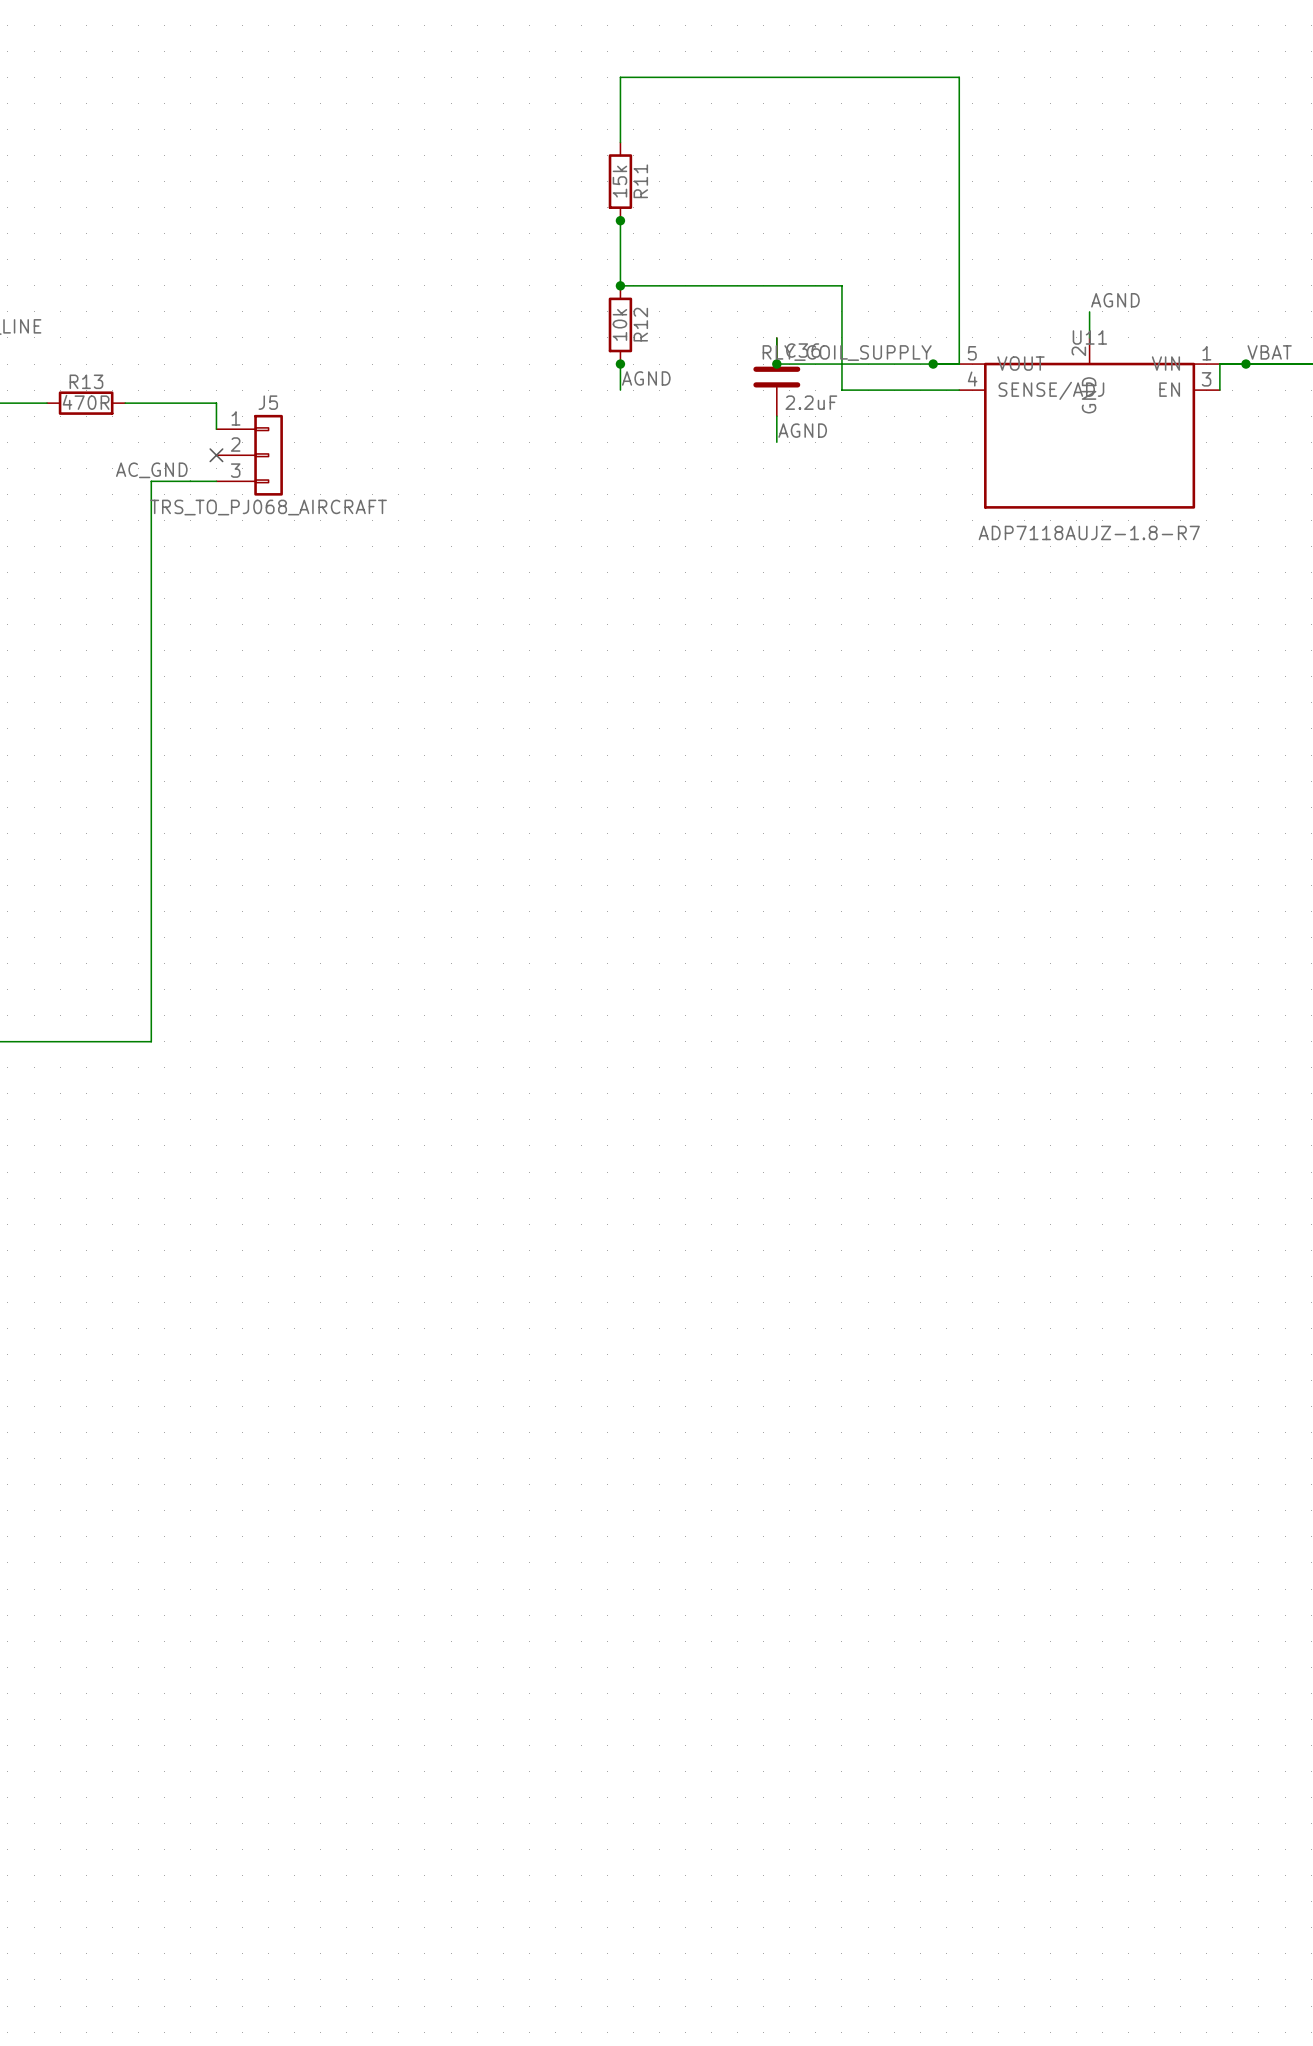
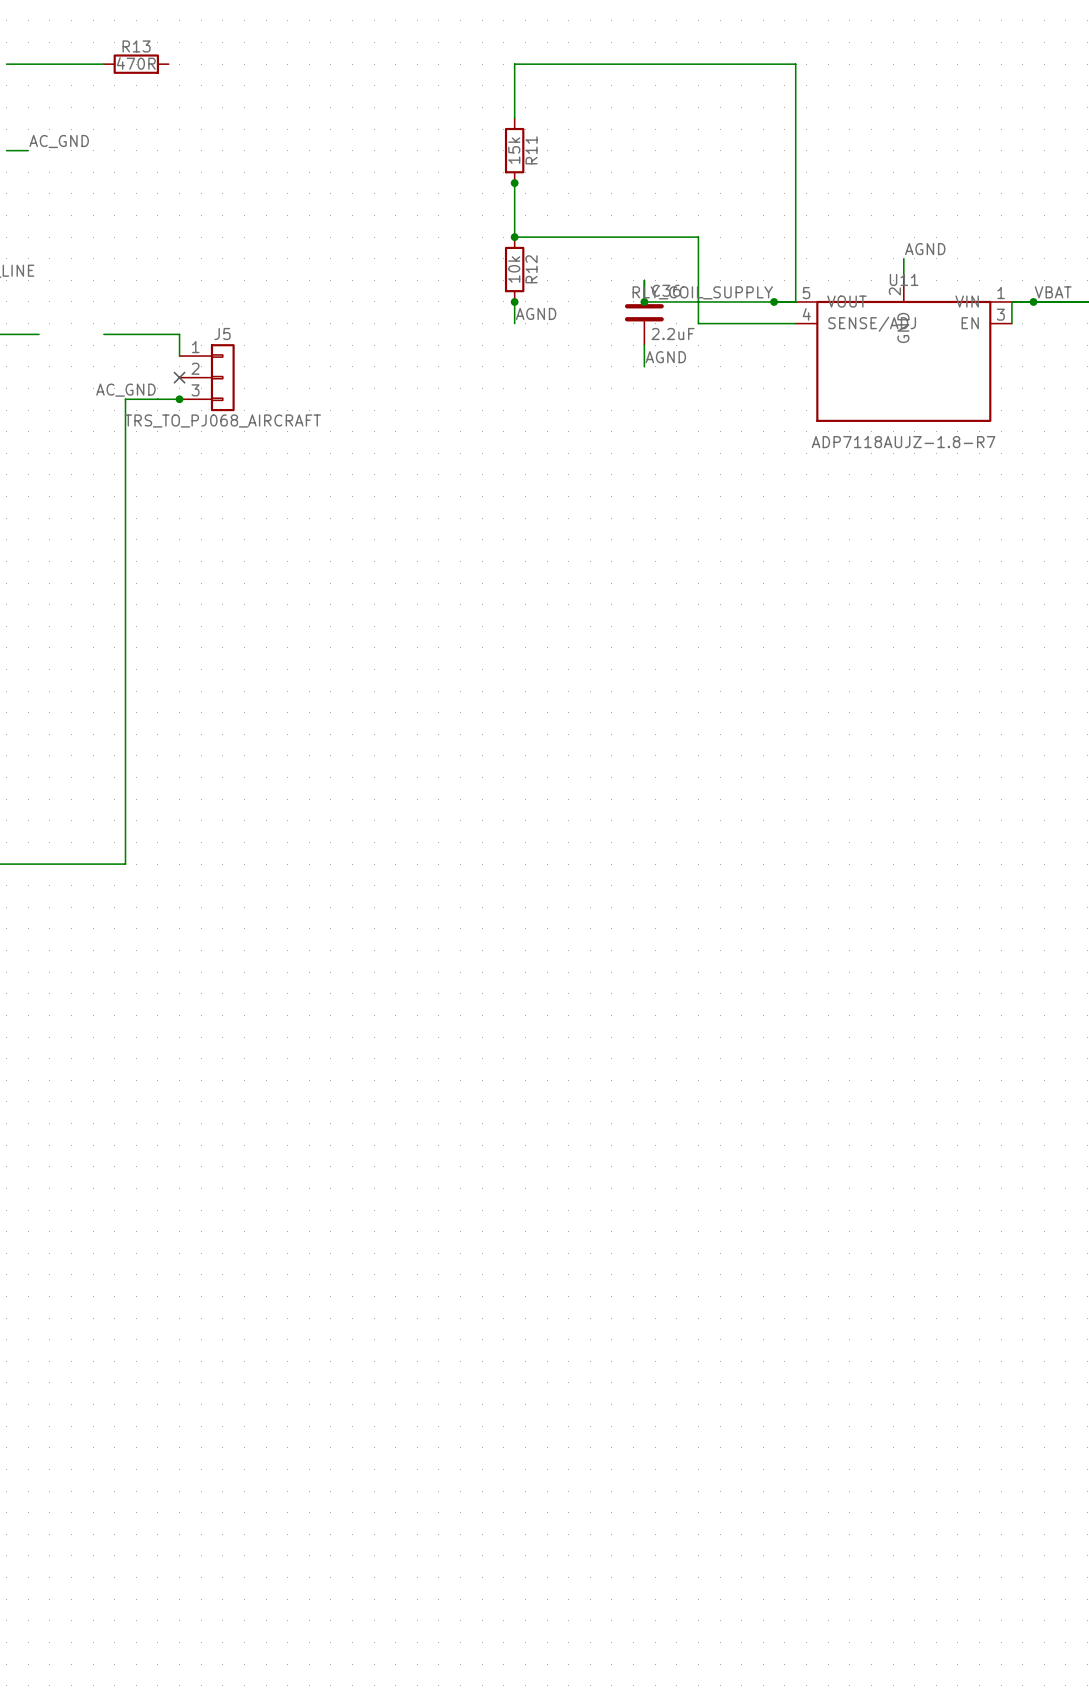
wire: none -> (6, 64) (103, 64)
label: none -> AC_GND (59, 141)
wire: none -> (6, 150) (28, 150)
R13 position: (86, 403) -> (136, 64)
junction: none -> (179, 399)

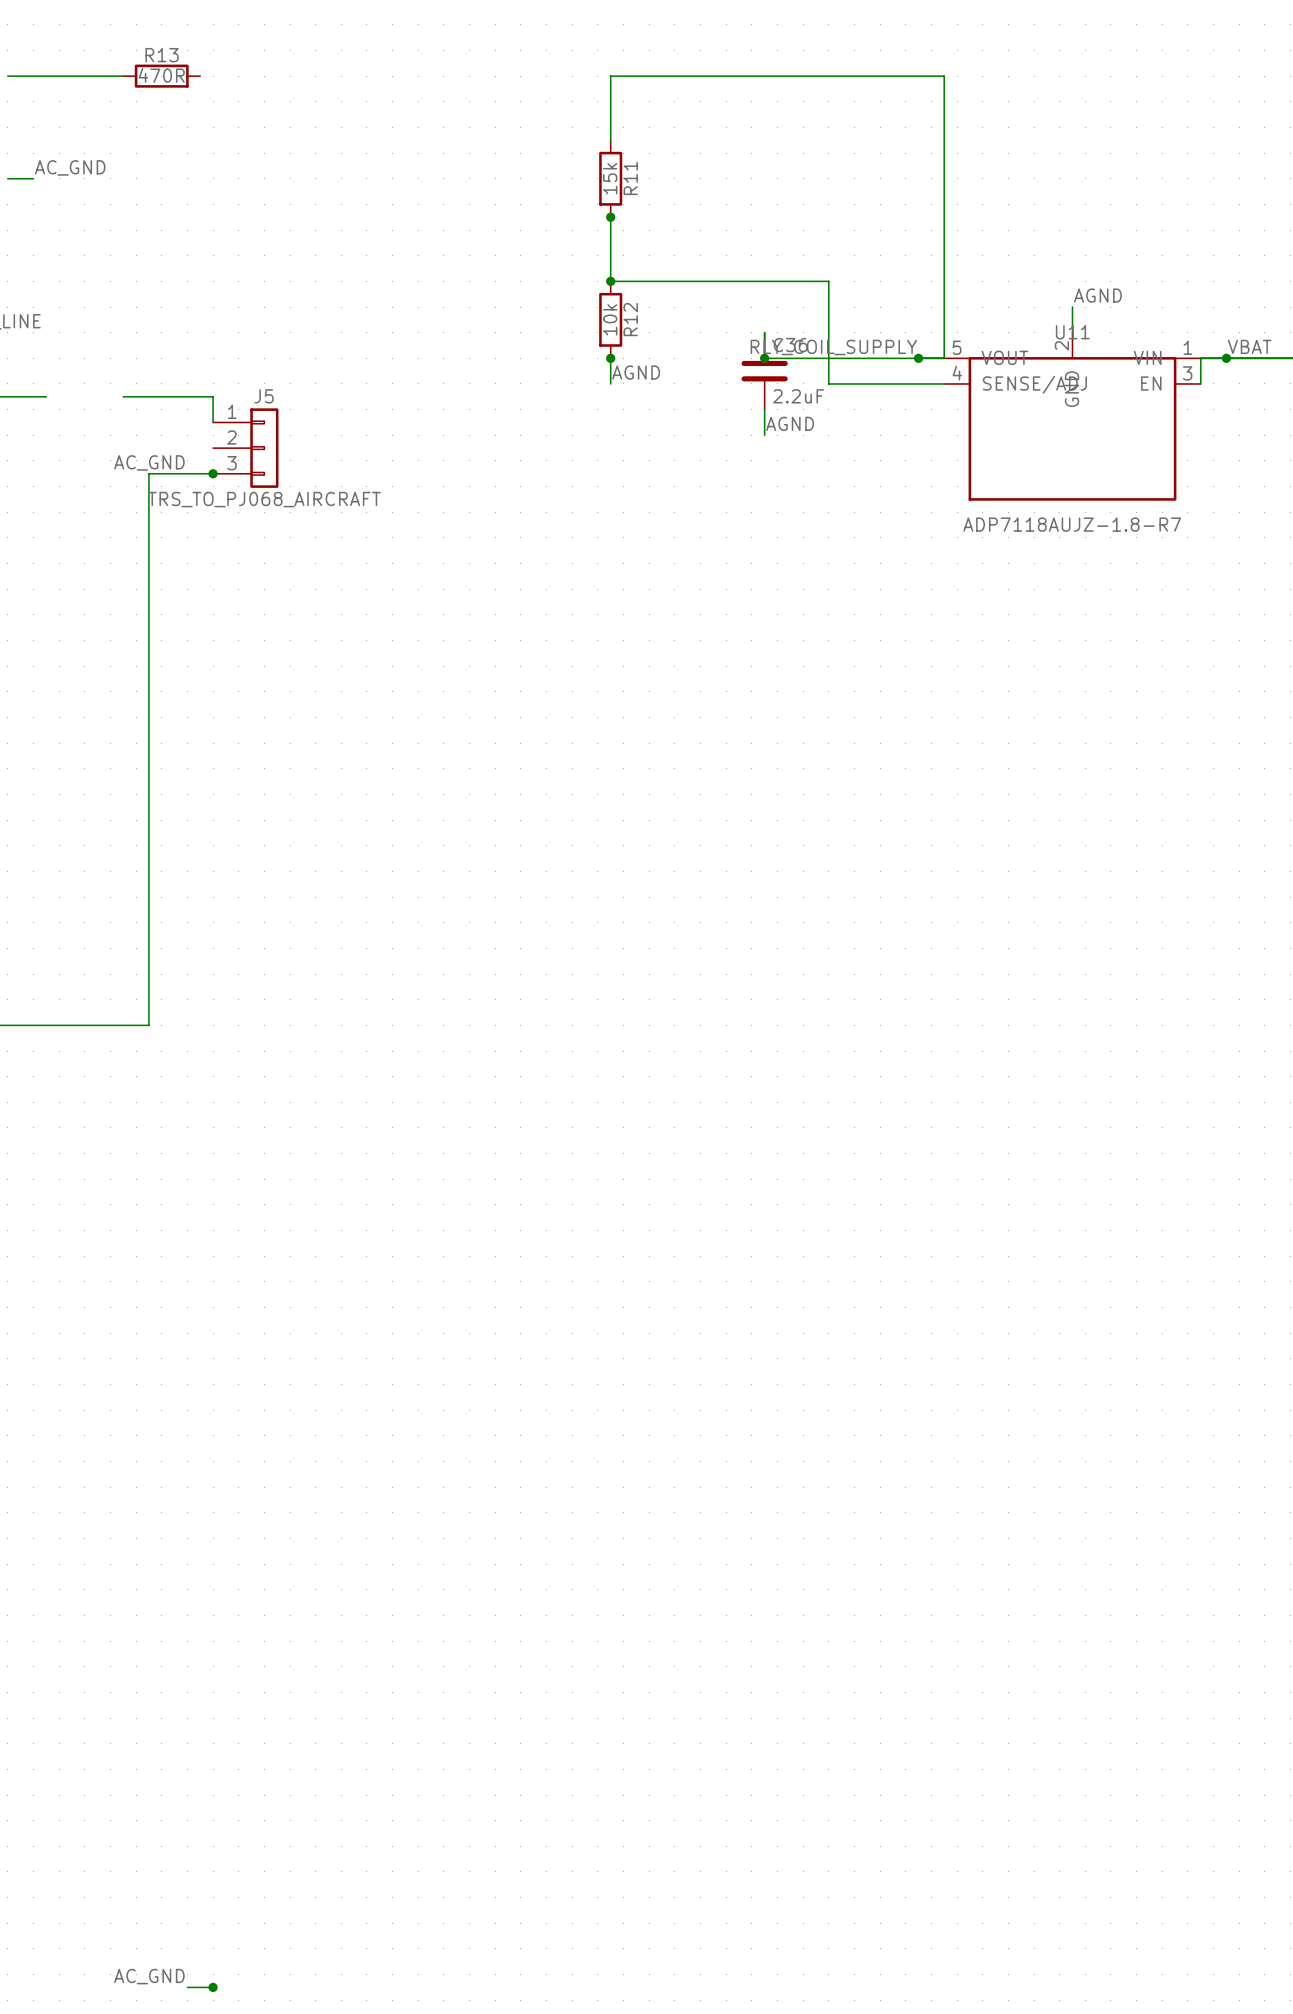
no-connect mark: (179, 377) -> none
label: none -> AC_GND (149, 1976)
wire: none -> (187, 1987) (213, 1987)
junction: none -> (213, 1987)

